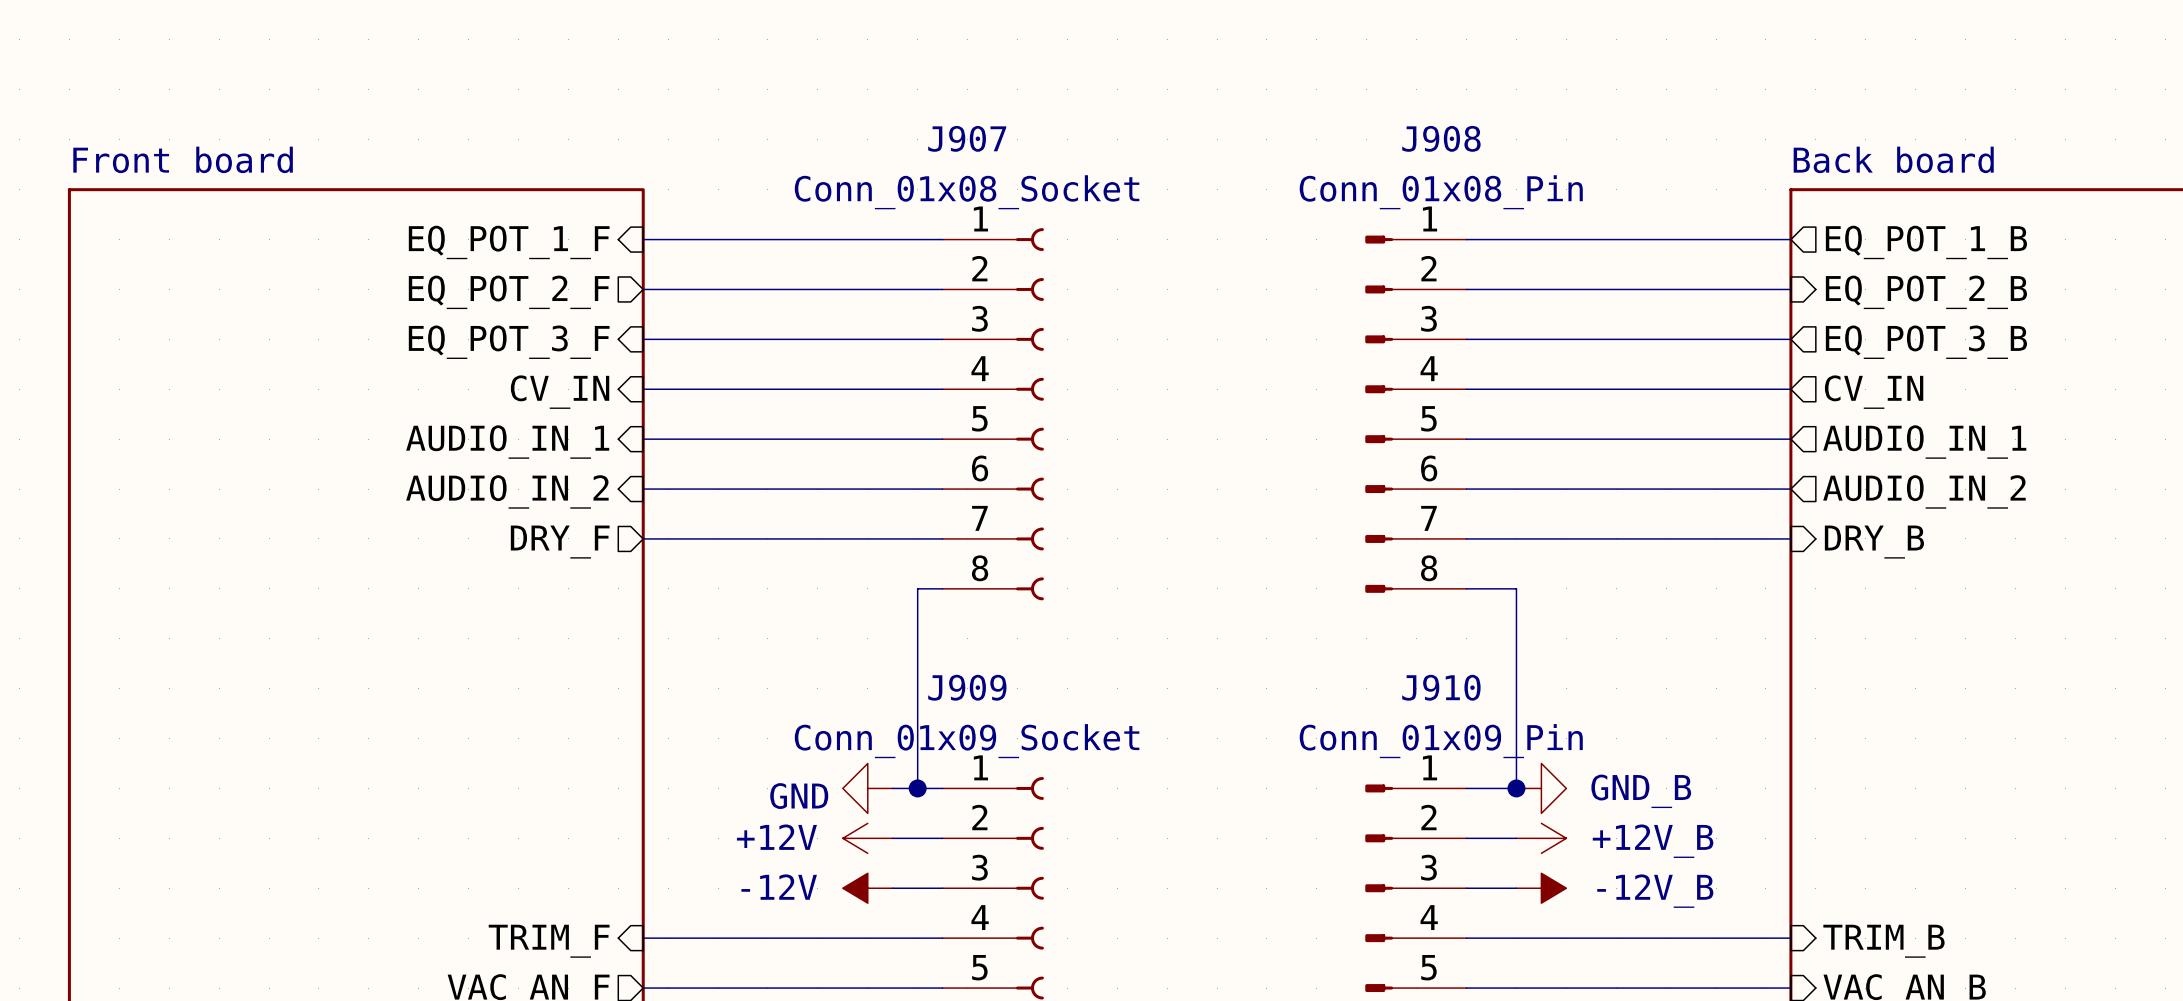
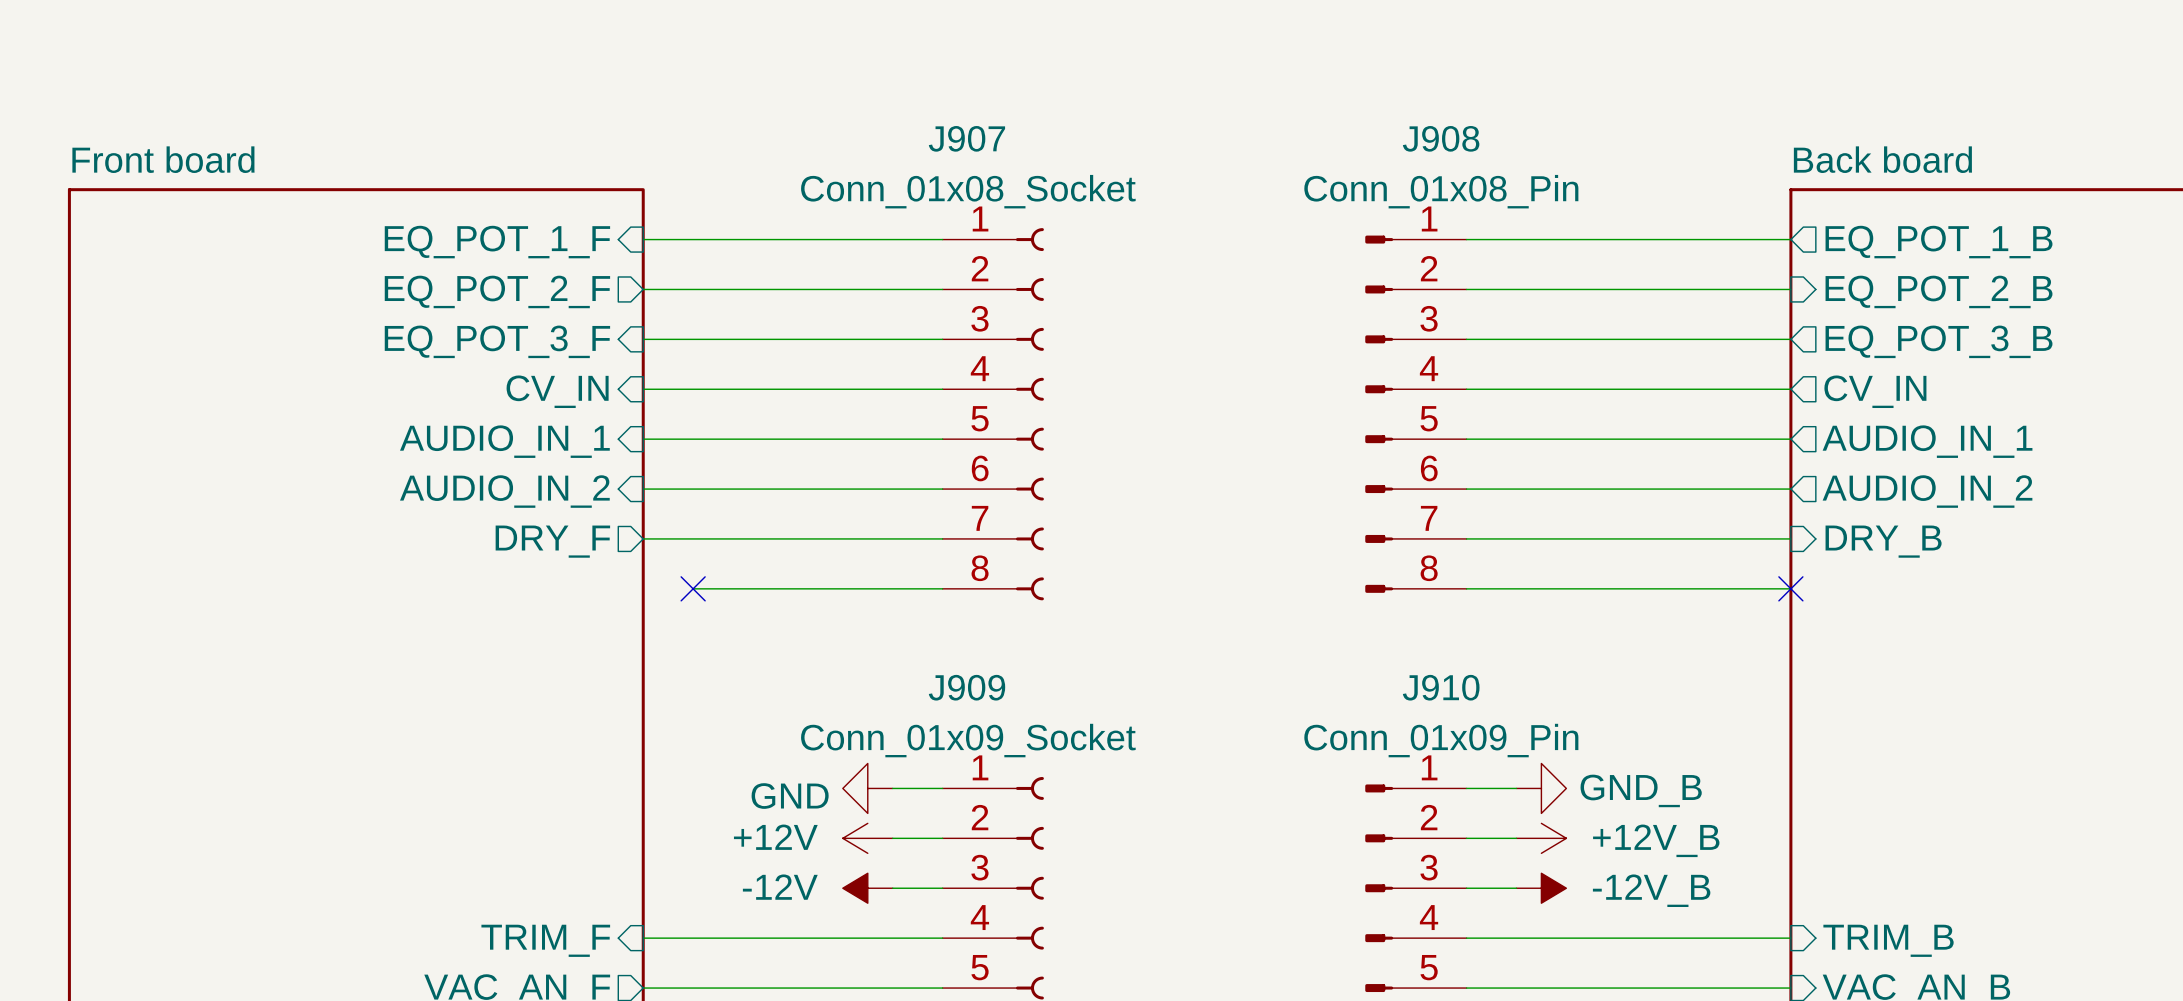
no-connect mark: none -> (693, 588)
wire: (917, 588) (917, 788) -> (917, 588) (693, 588)
wire: (1516, 588) (1516, 788) -> (1516, 588) (1790, 588)
no-connect mark: none -> (1790, 588)
junction: (917, 788) -> none
junction: (1516, 788) -> none

